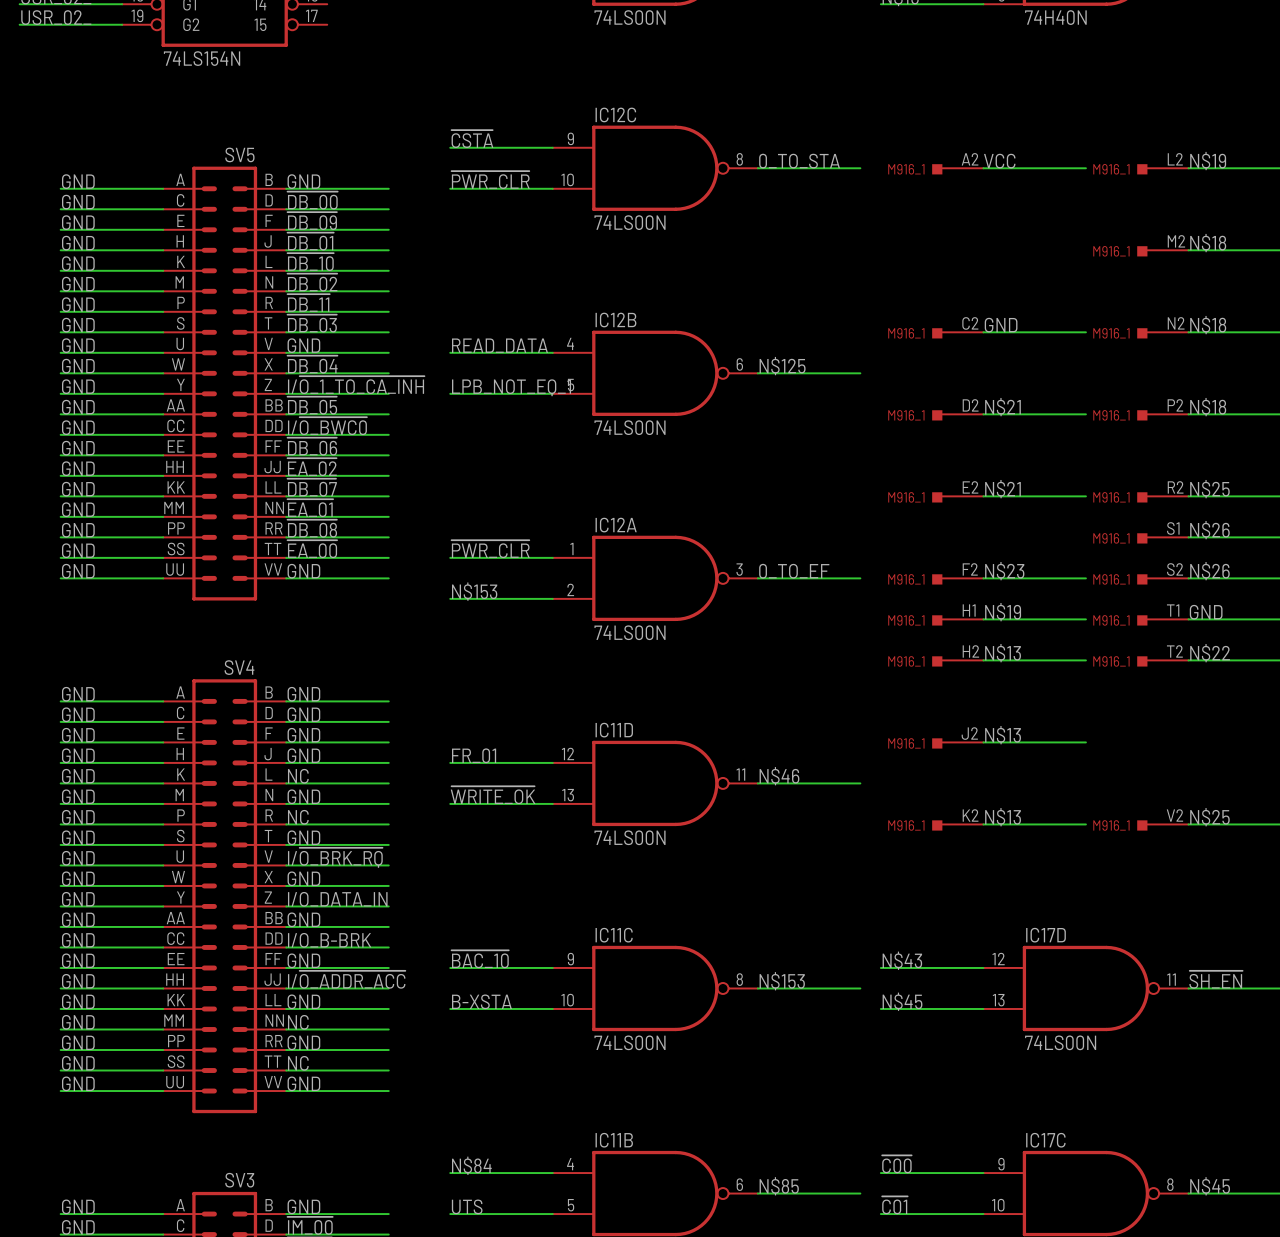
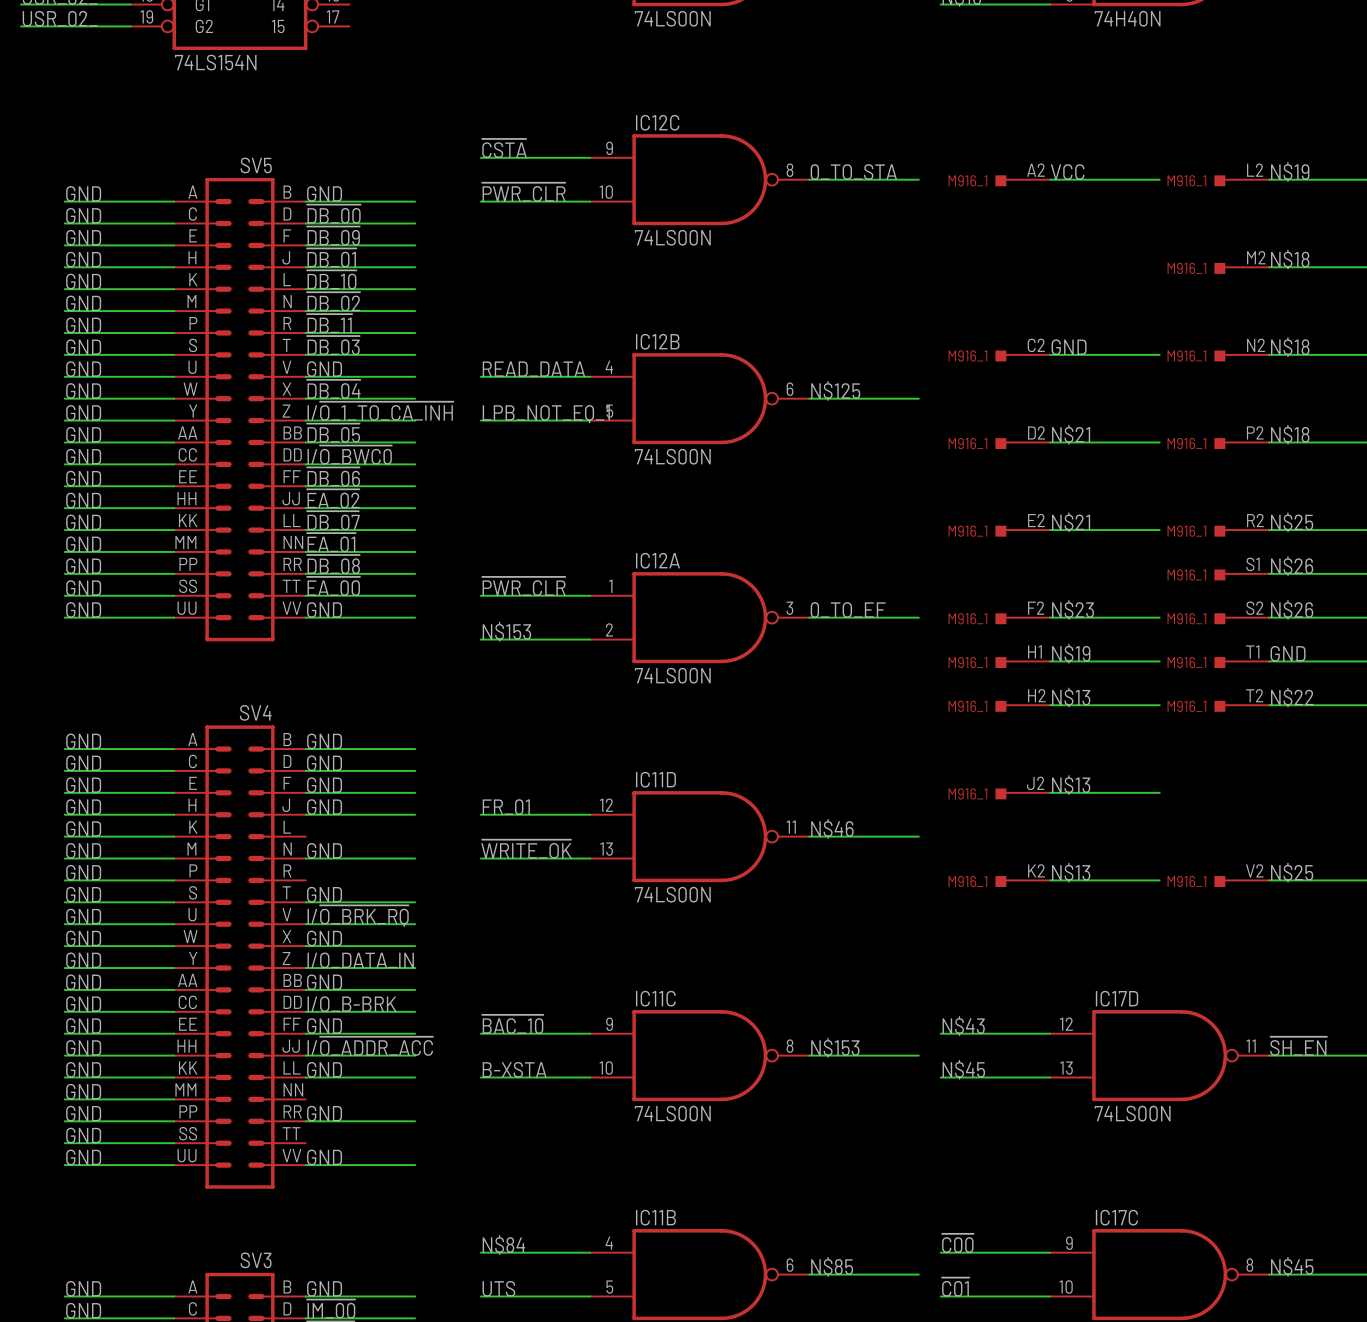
label: NC (298, 776) -> none
wire: (286, 783) (388, 783) -> none
label: NC (298, 817) -> none
wire: (286, 824) (388, 824) -> none
label: NC (298, 1022) -> none
wire: (286, 1029) (388, 1029) -> none
label: NC (298, 1063) -> none
wire: (286, 1070) (388, 1070) -> none

